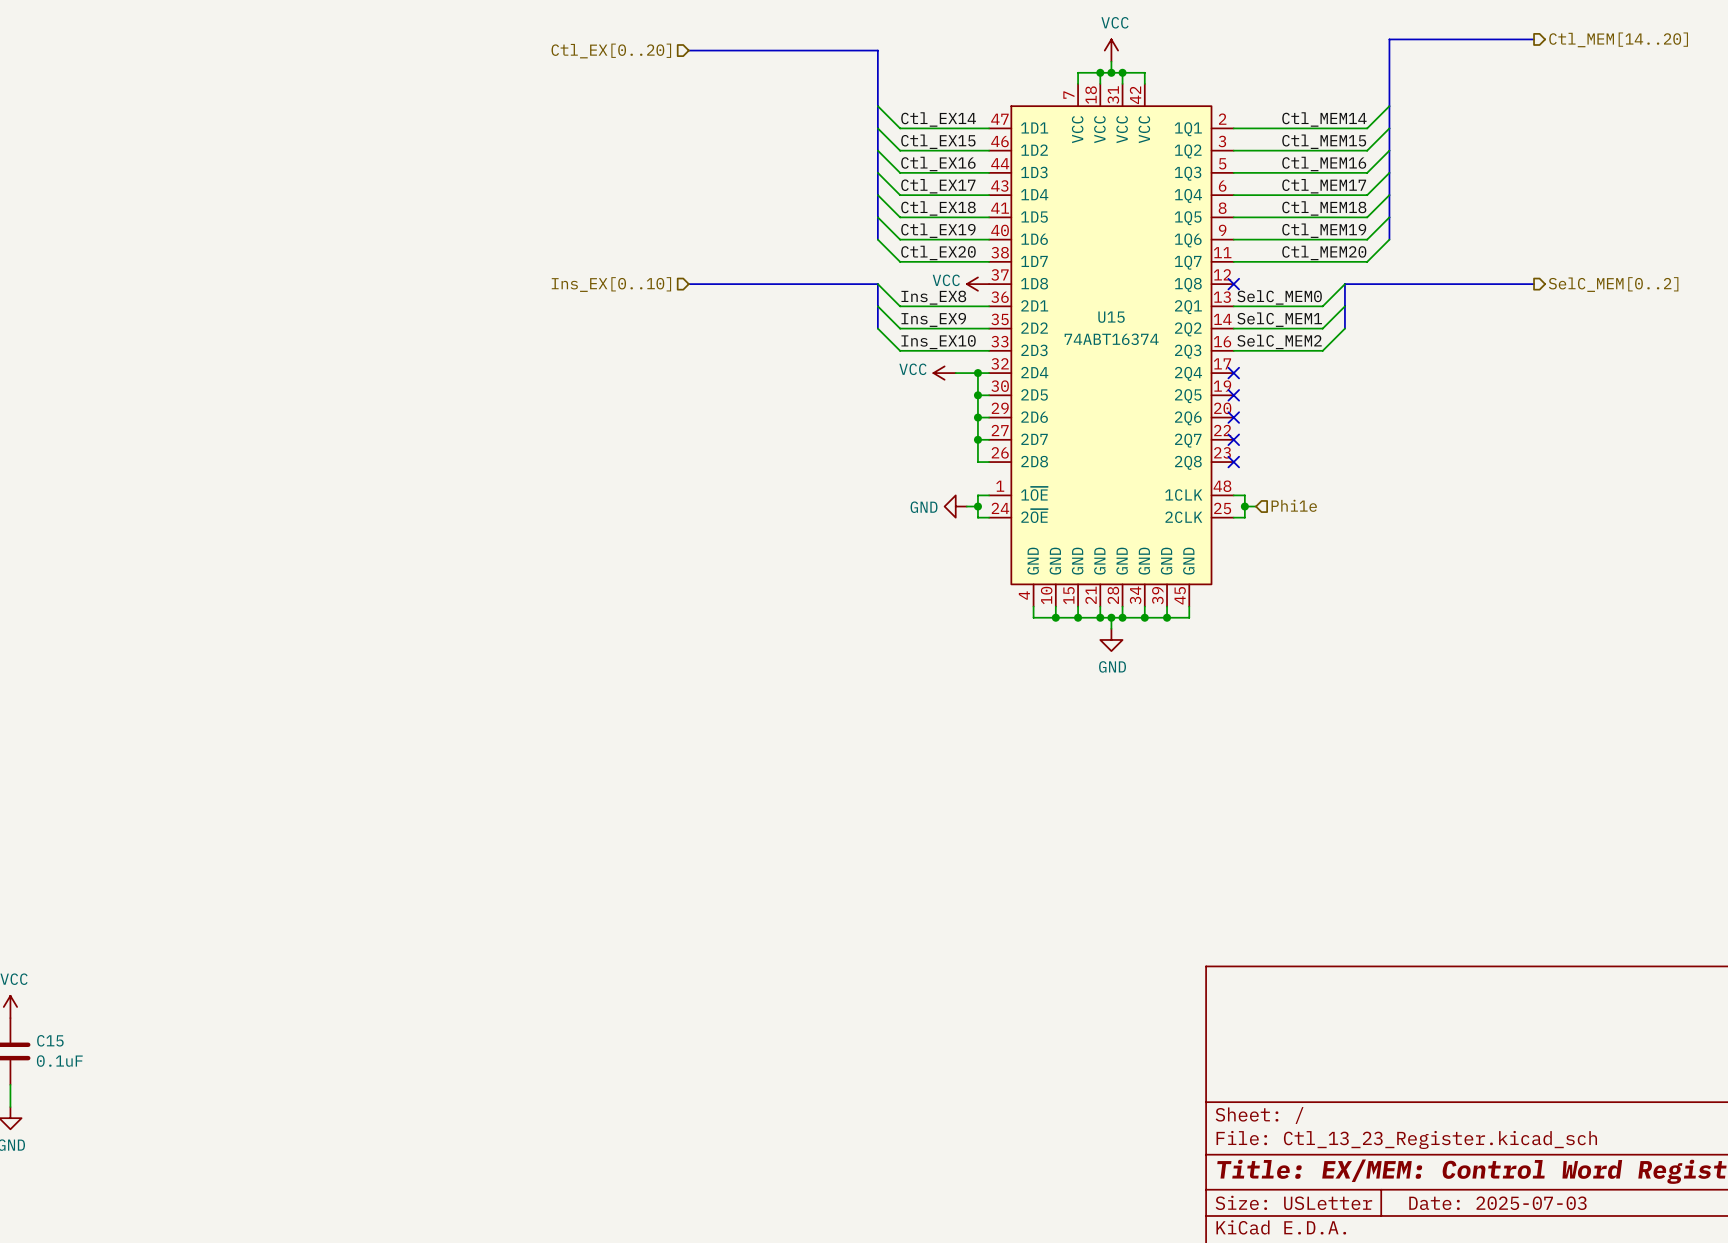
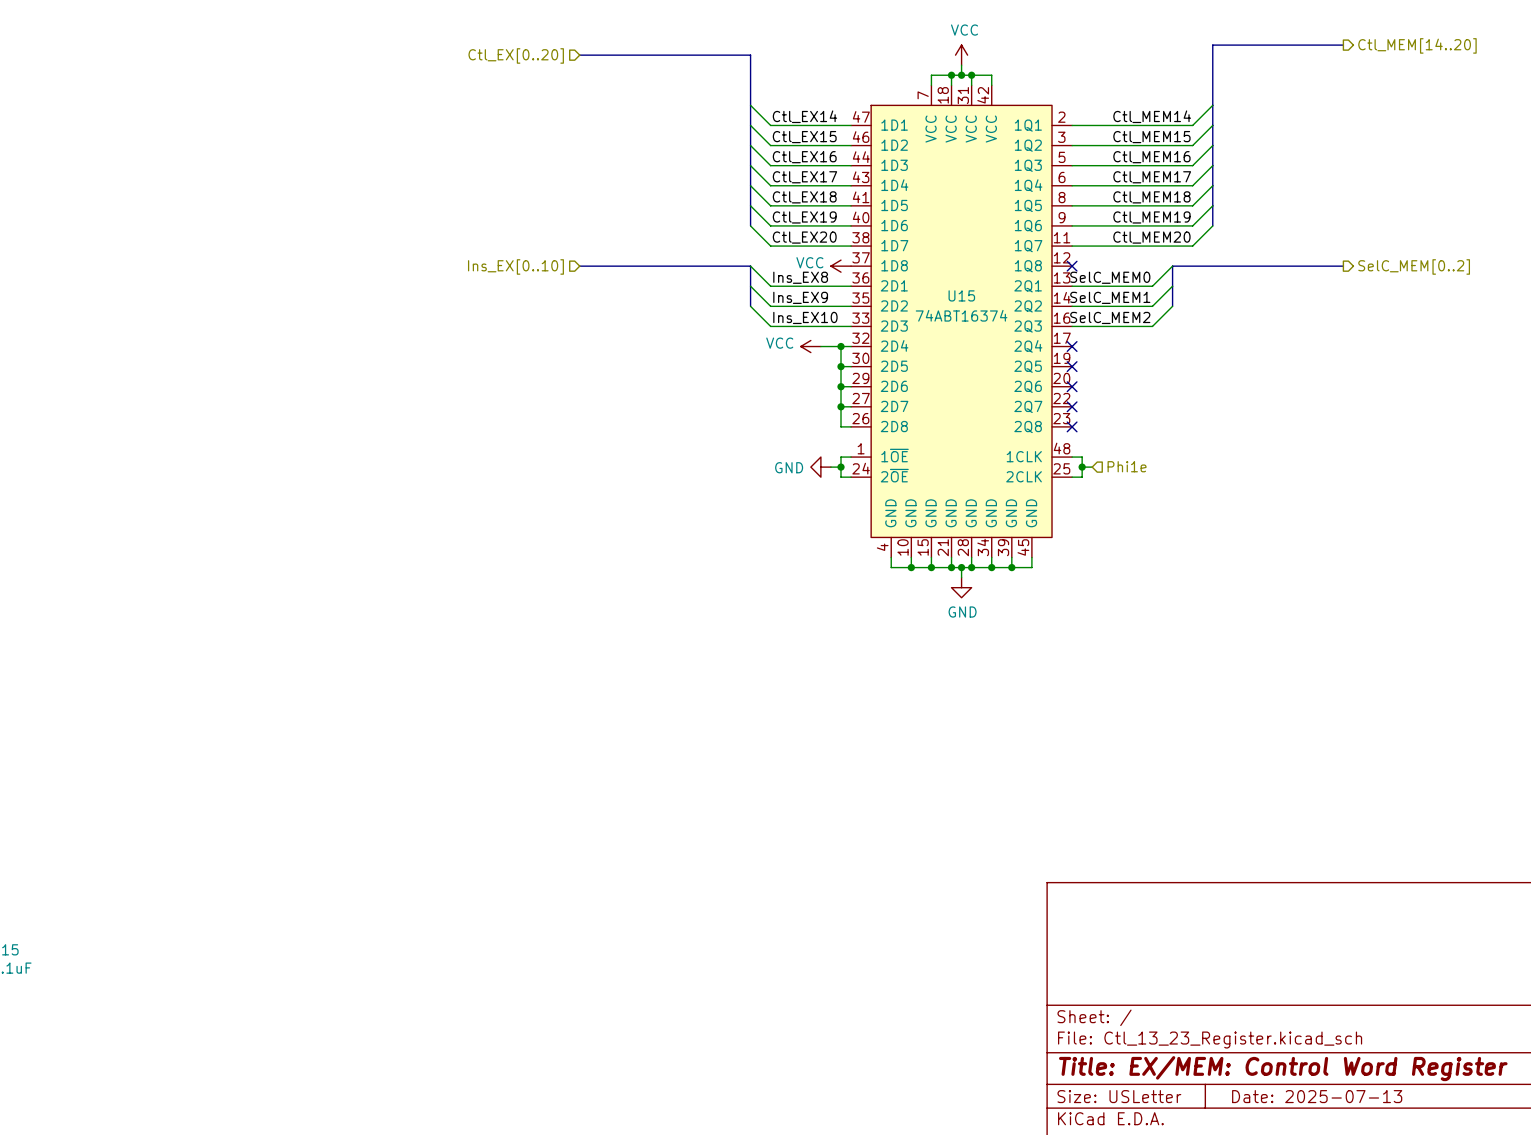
title block: Date: 2025-07-03 (1497, 1203) -> Date: 2025-07-13 (1317, 1096)

